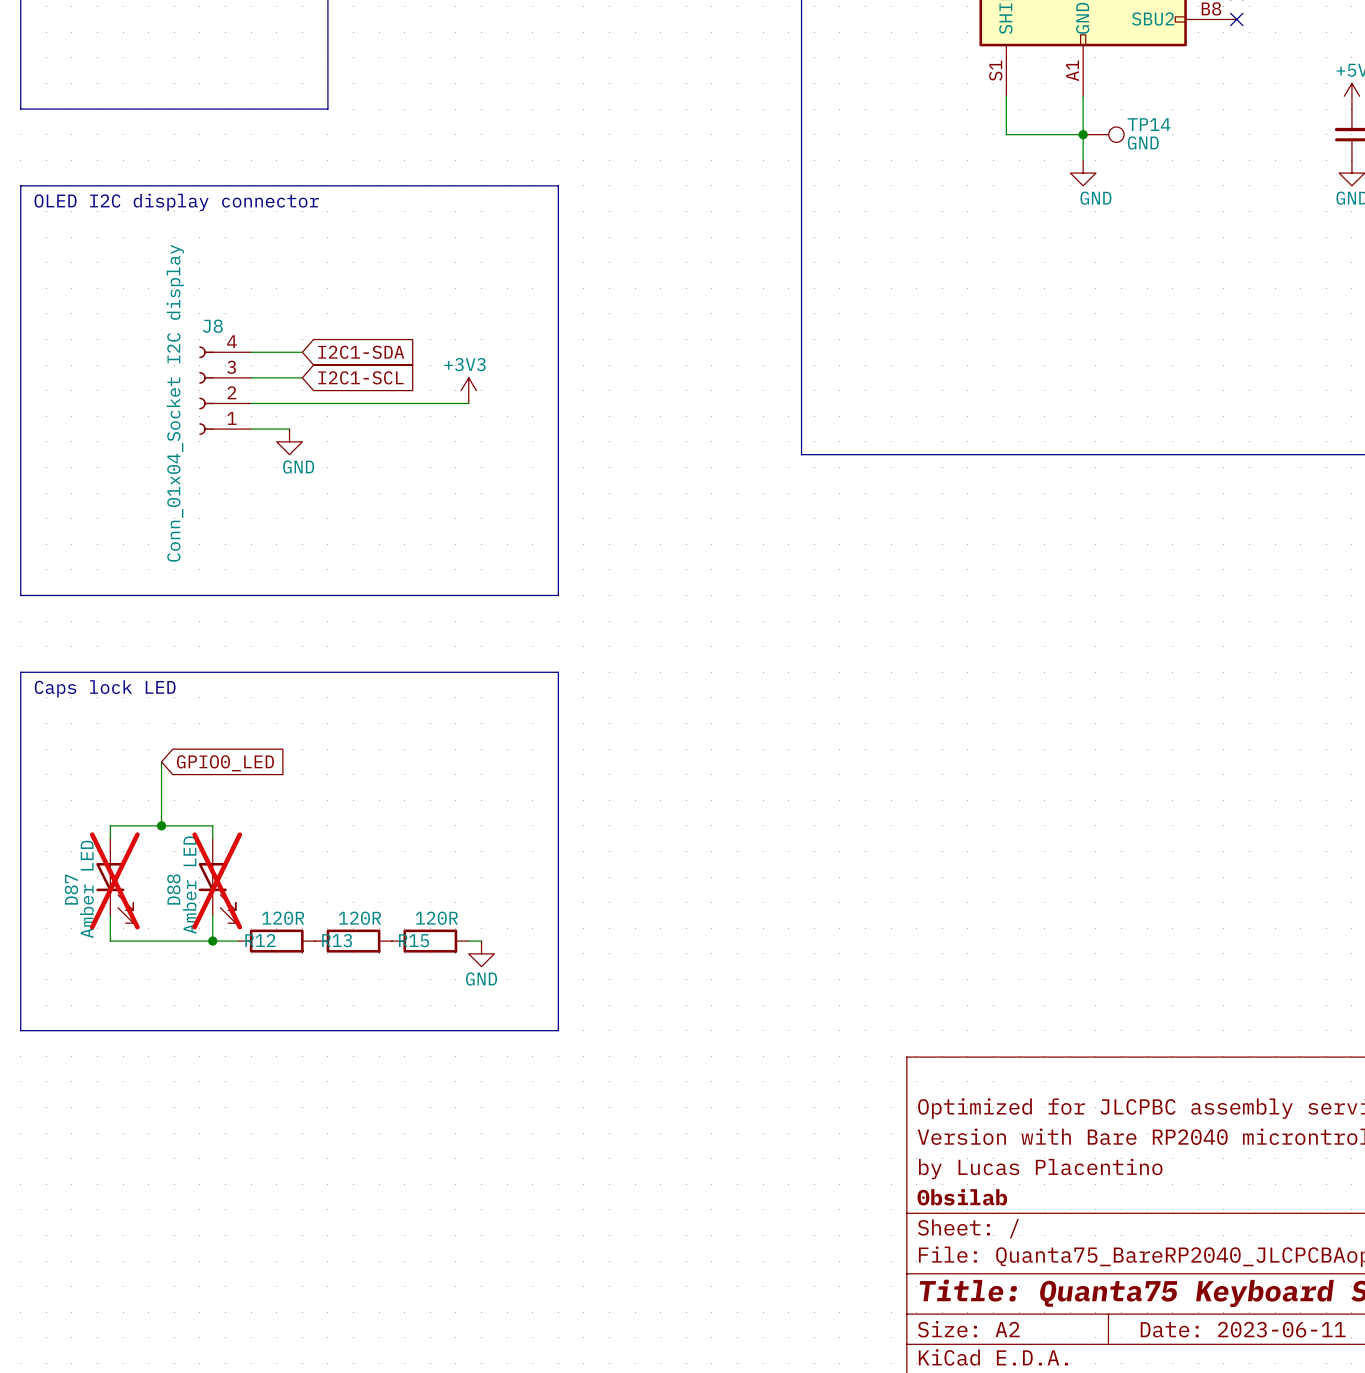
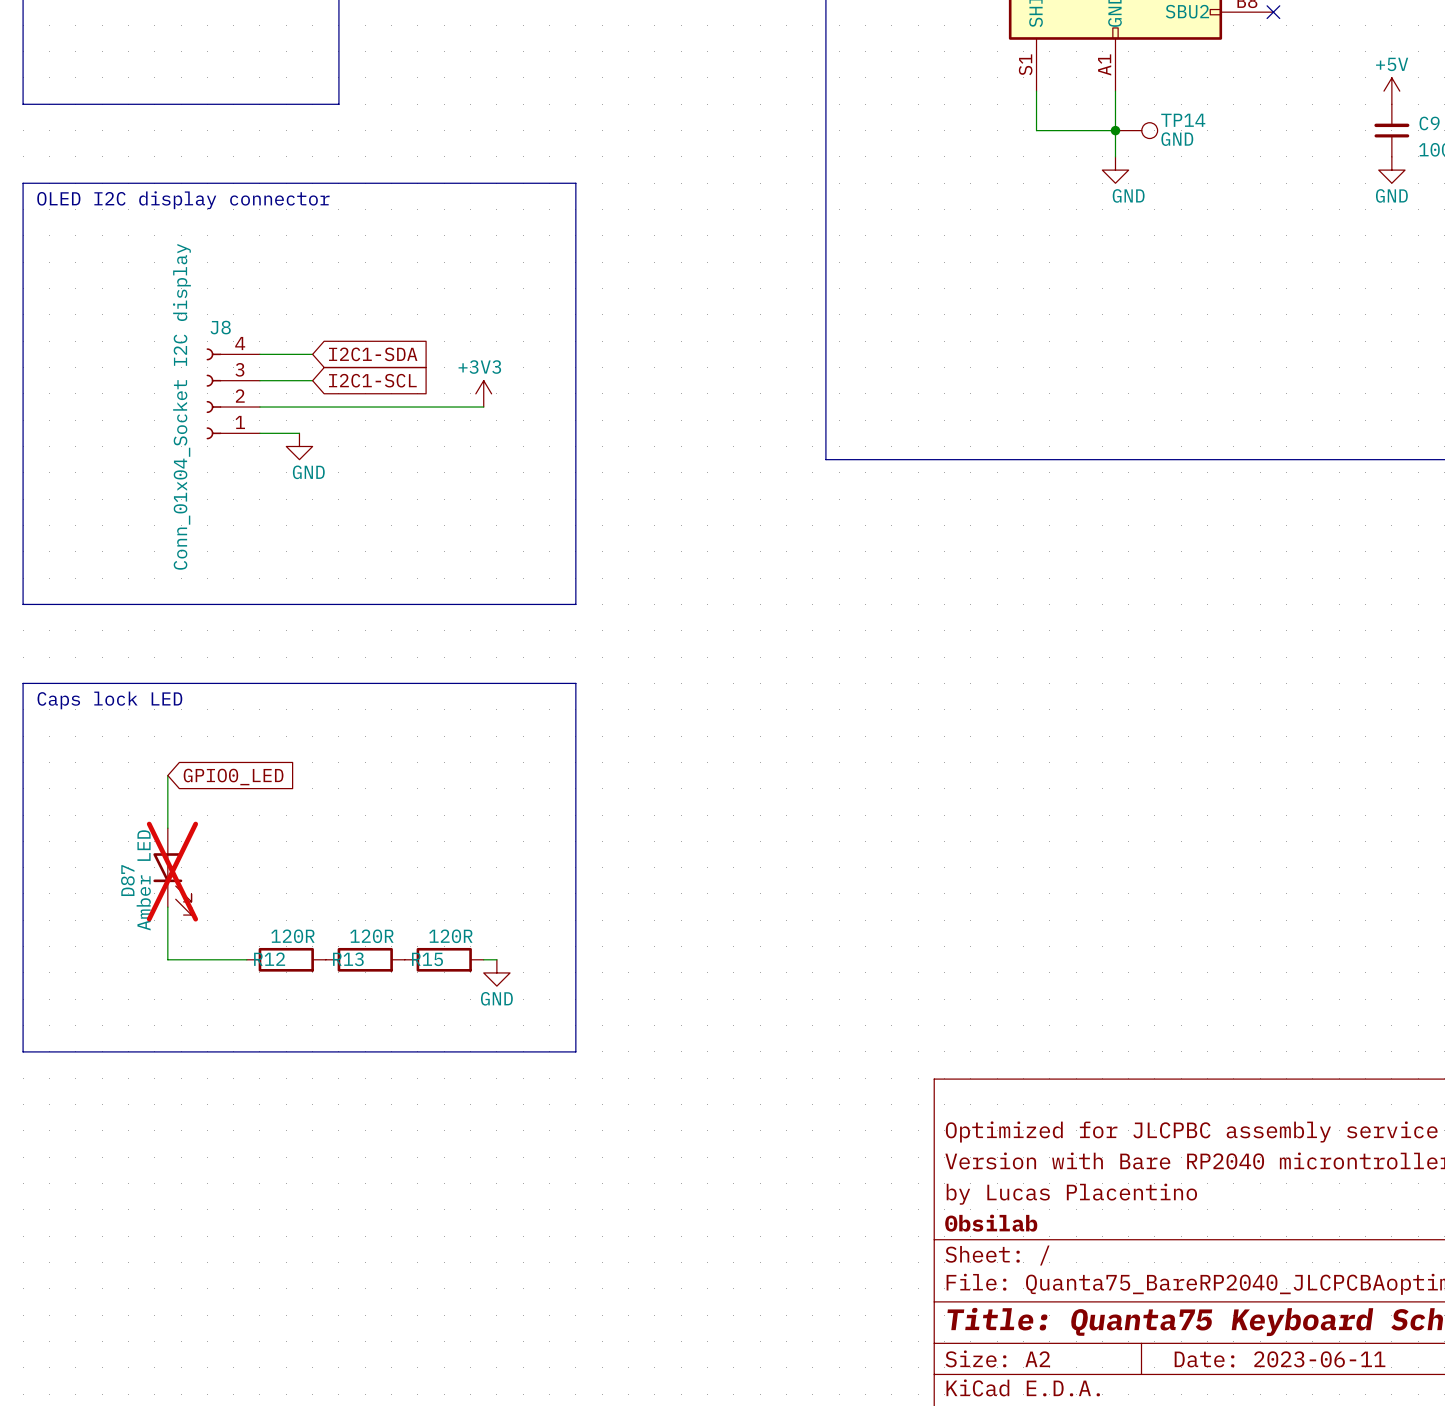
junction: (161, 825) -> none
wire: (110, 838) (110, 825) (212, 825) (212, 838) -> none
D87 position: (114, 880) -> (172, 871)
D88: Amber LED (217, 880) -> none
wire: (110, 915) (110, 941) (161, 941) -> (167, 907) (167, 959)
wire: (212, 915) (212, 941) -> none
junction: (212, 941) -> none

